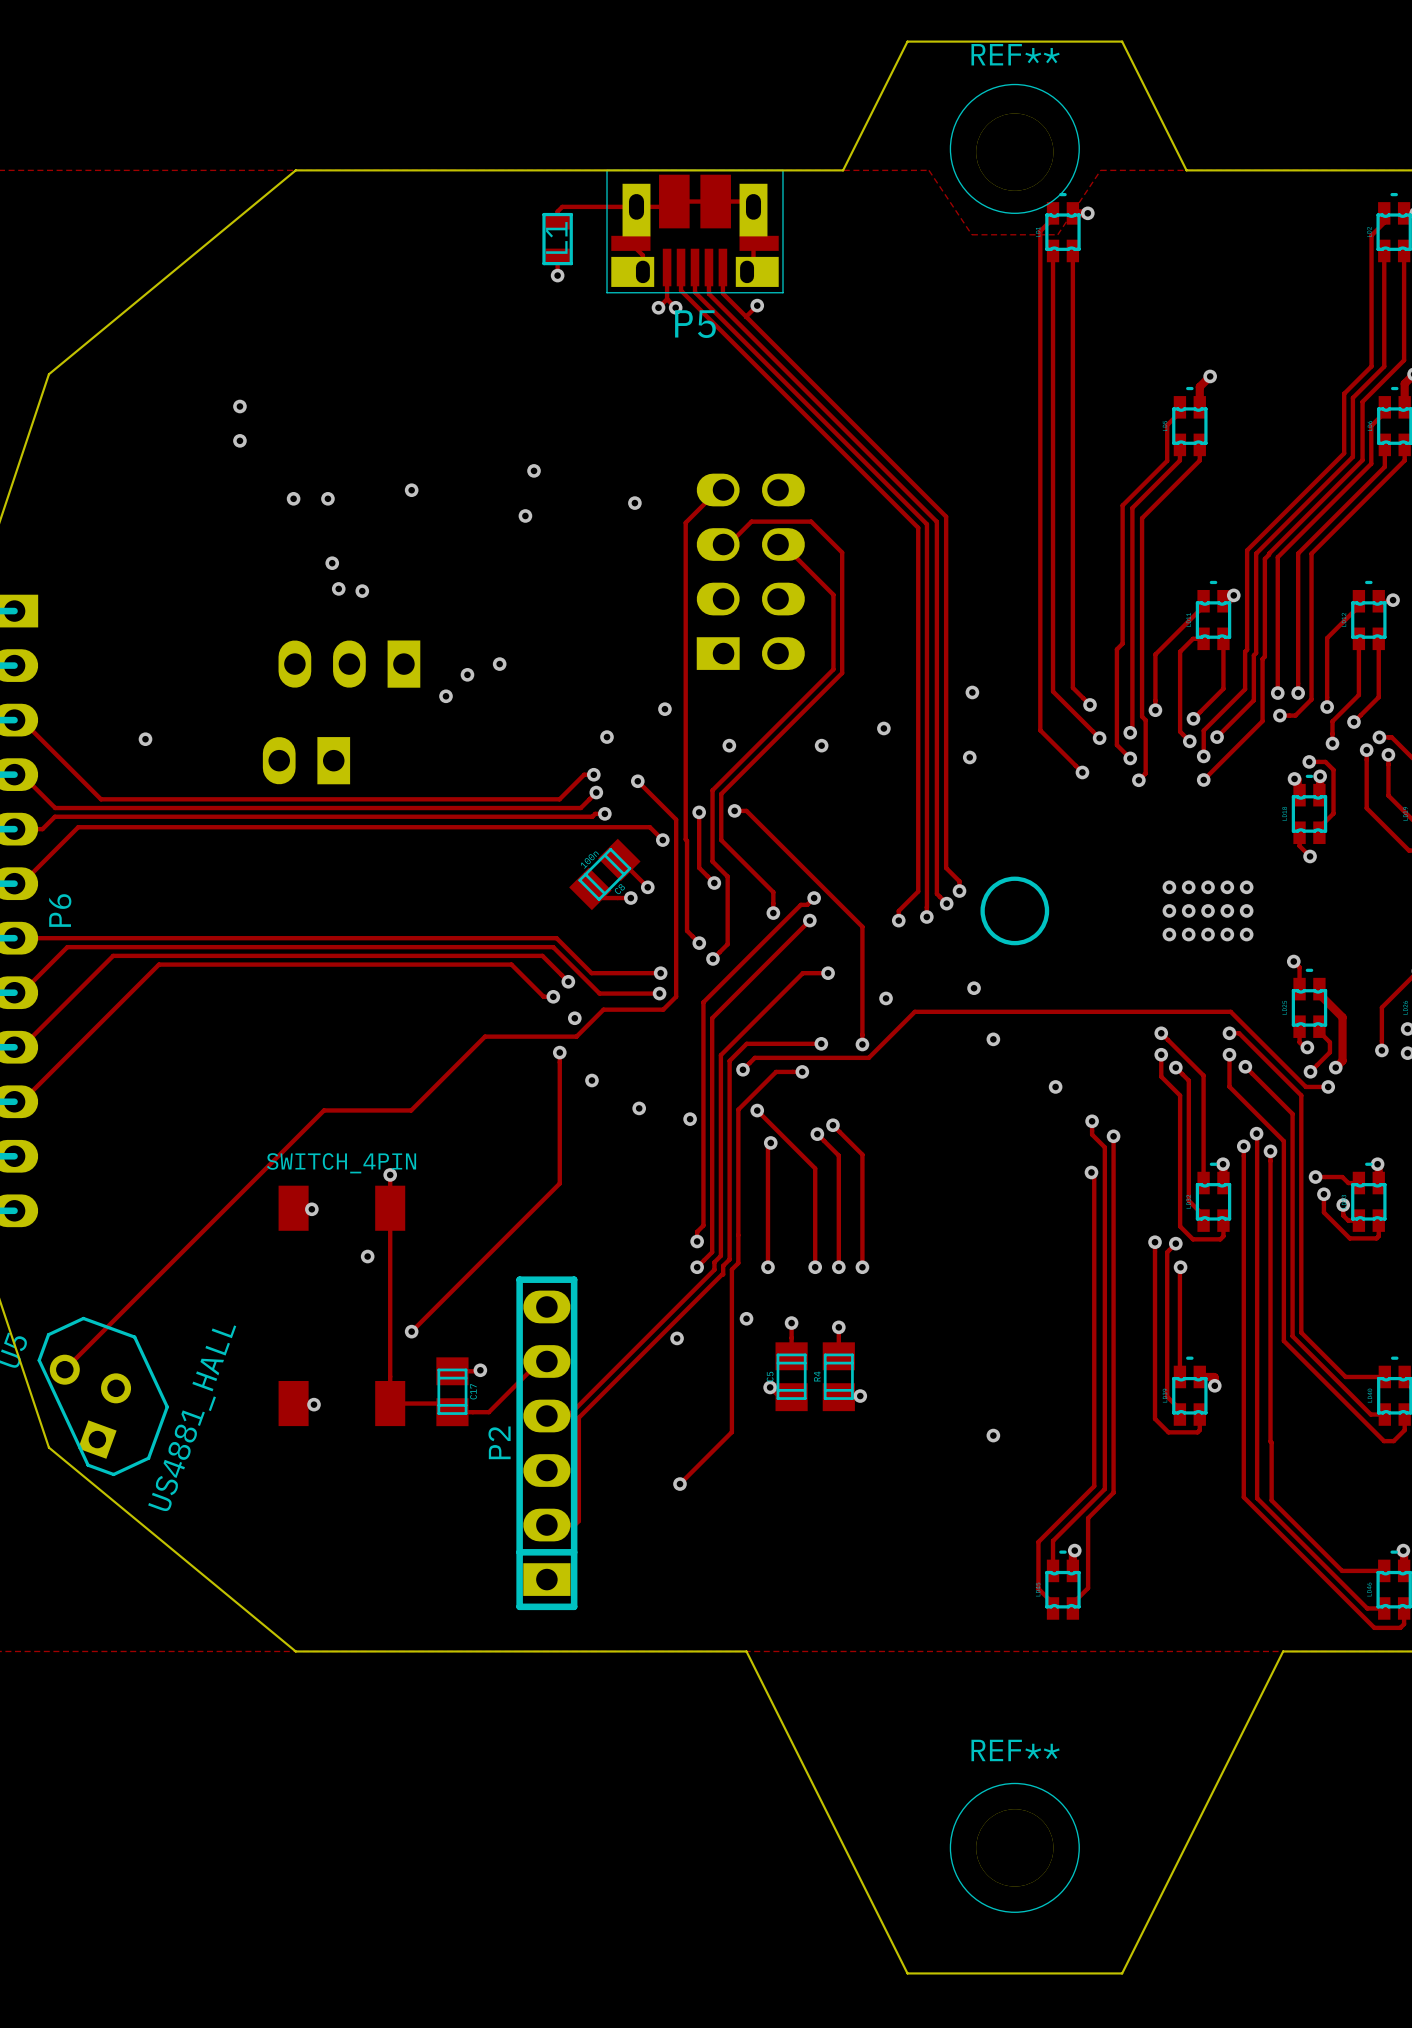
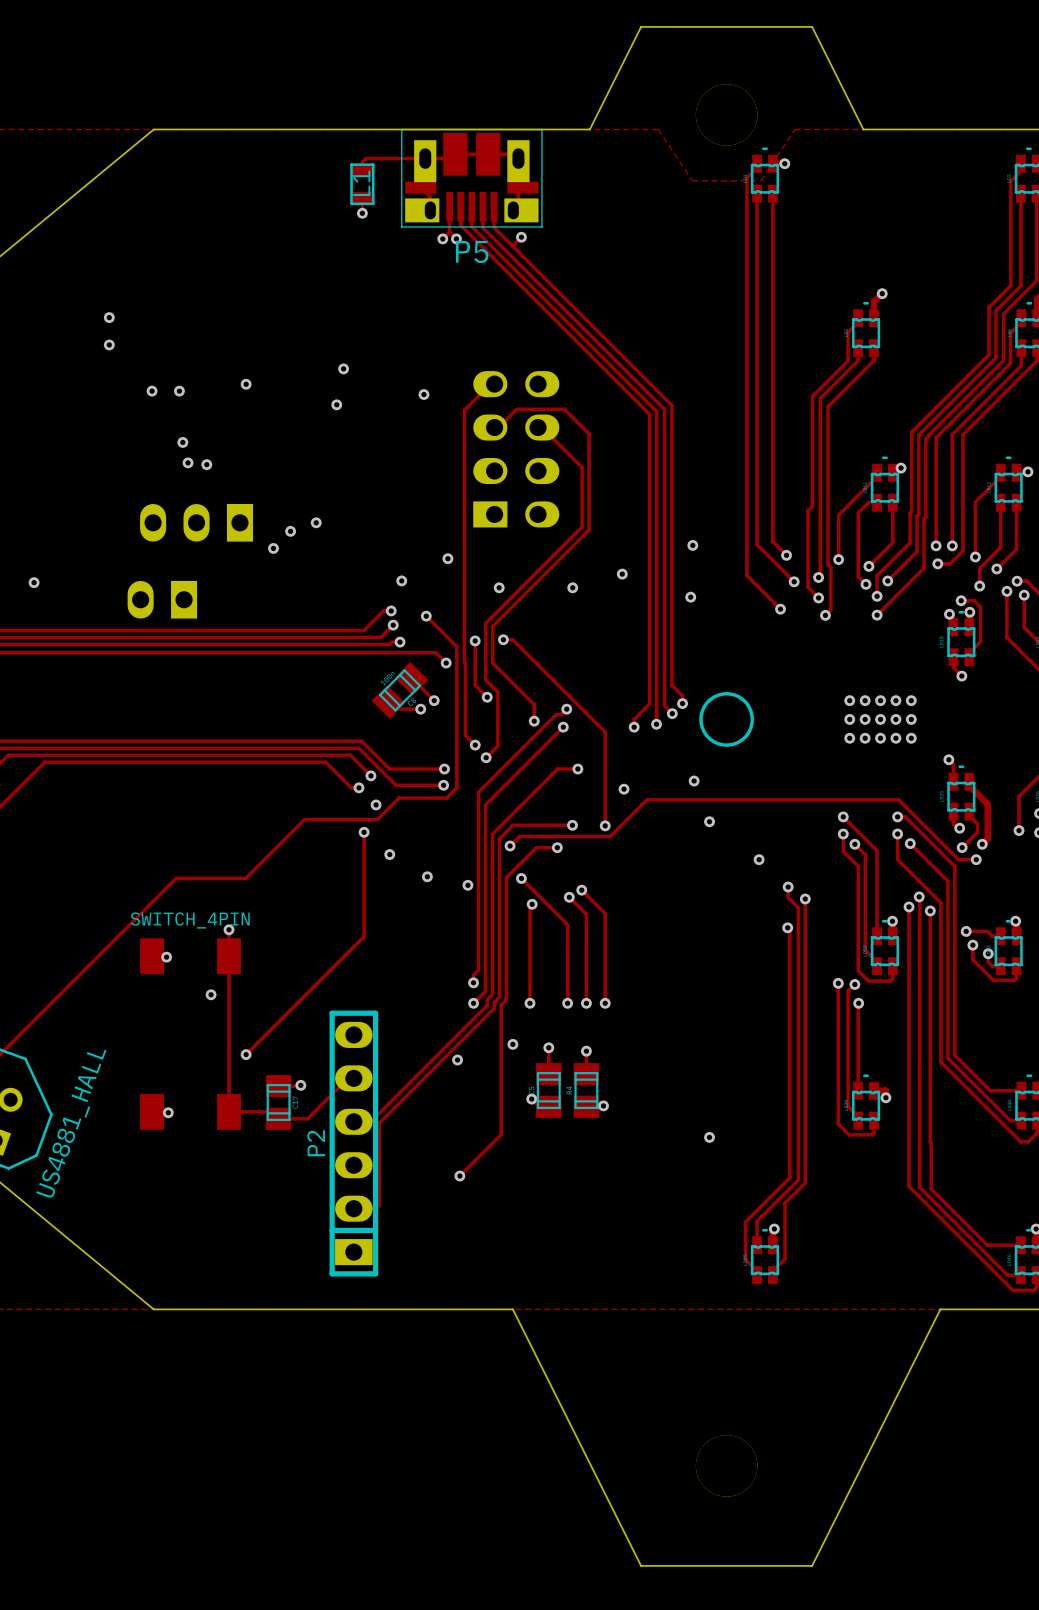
REF** name: REF** (1015, 54) -> none
drawing: [950, 84, 1080, 214] -> none
REF** name: REF** (1015, 1750) -> none
drawing: [950, 1783, 1080, 1913] -> none

